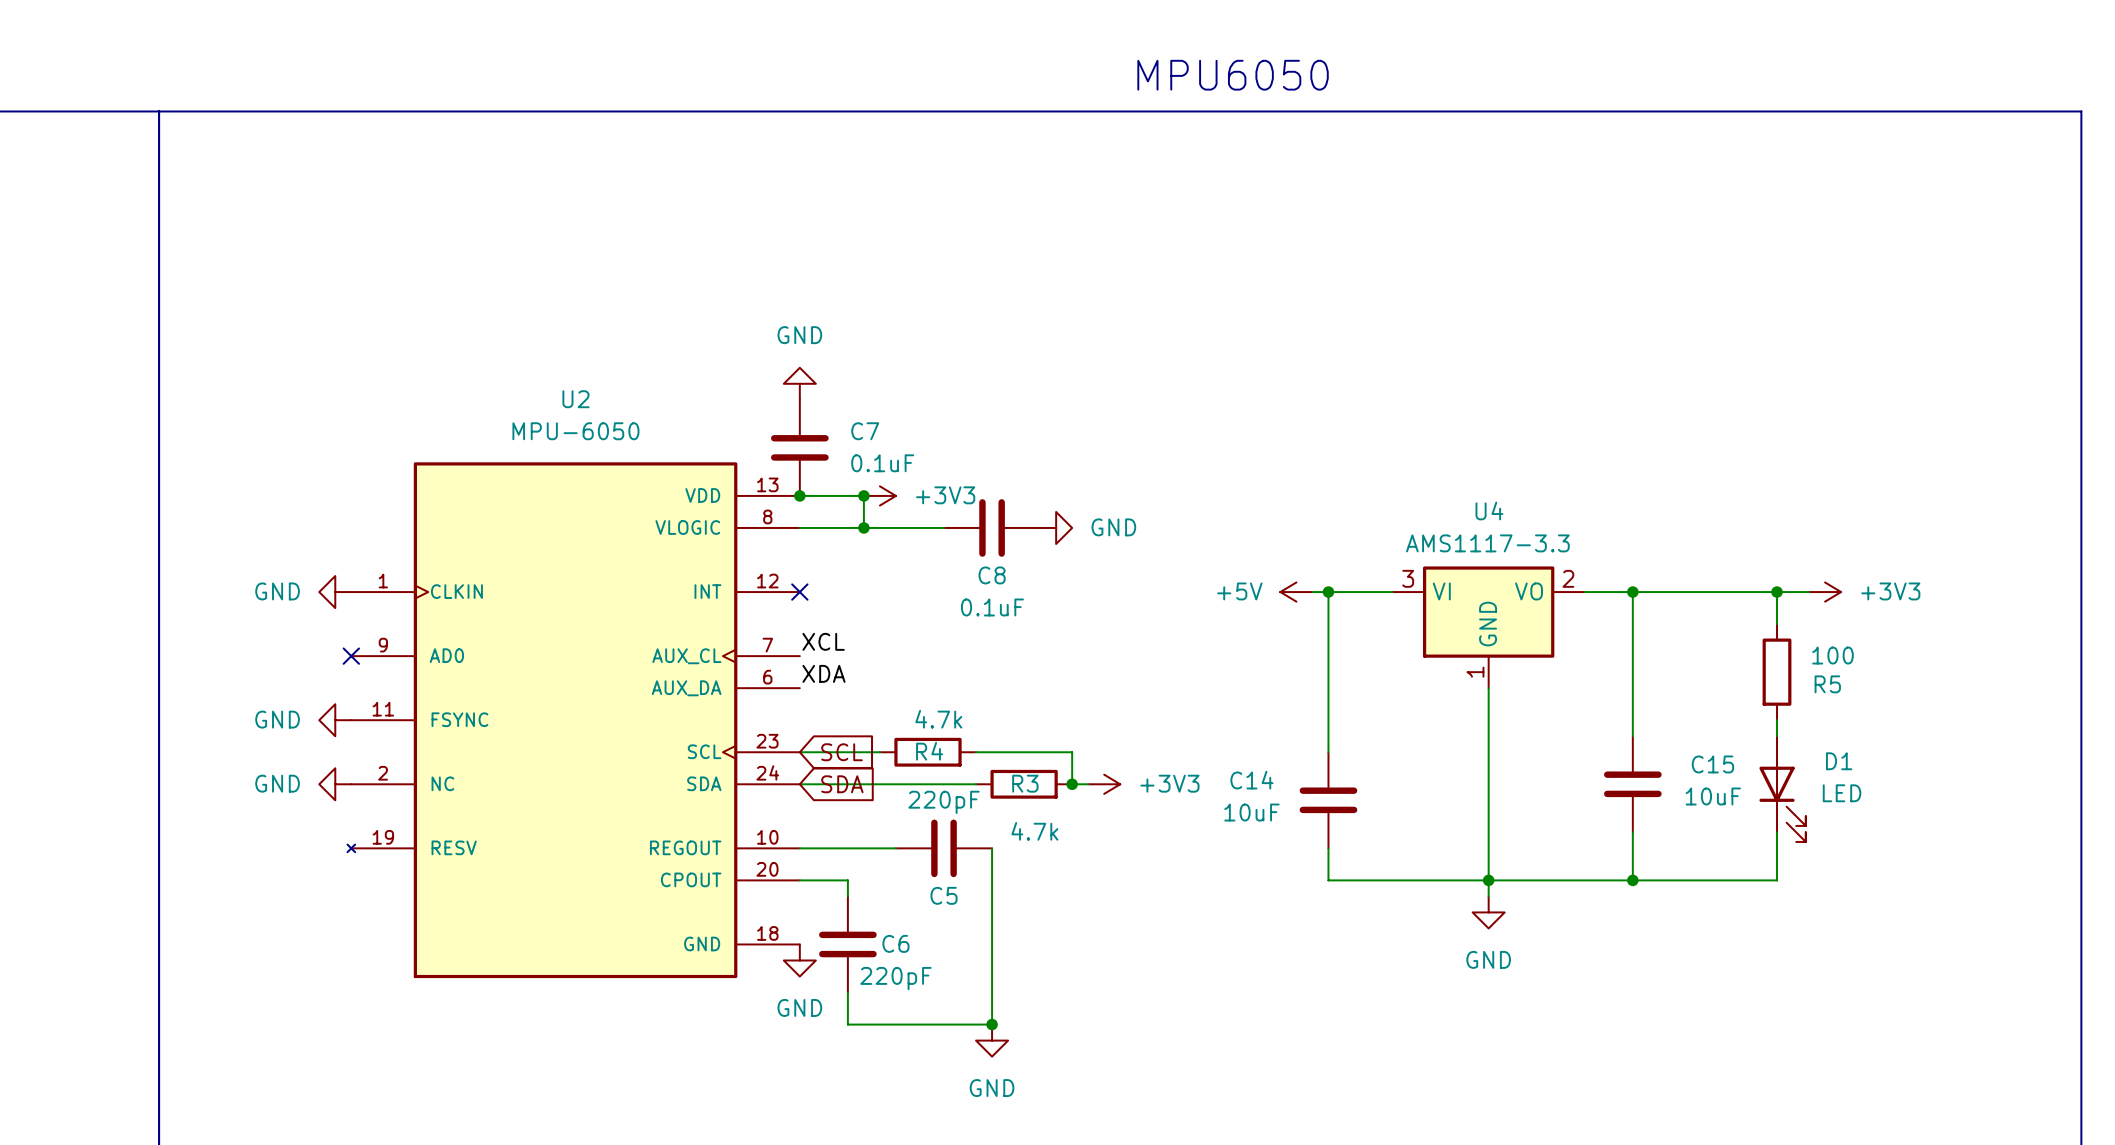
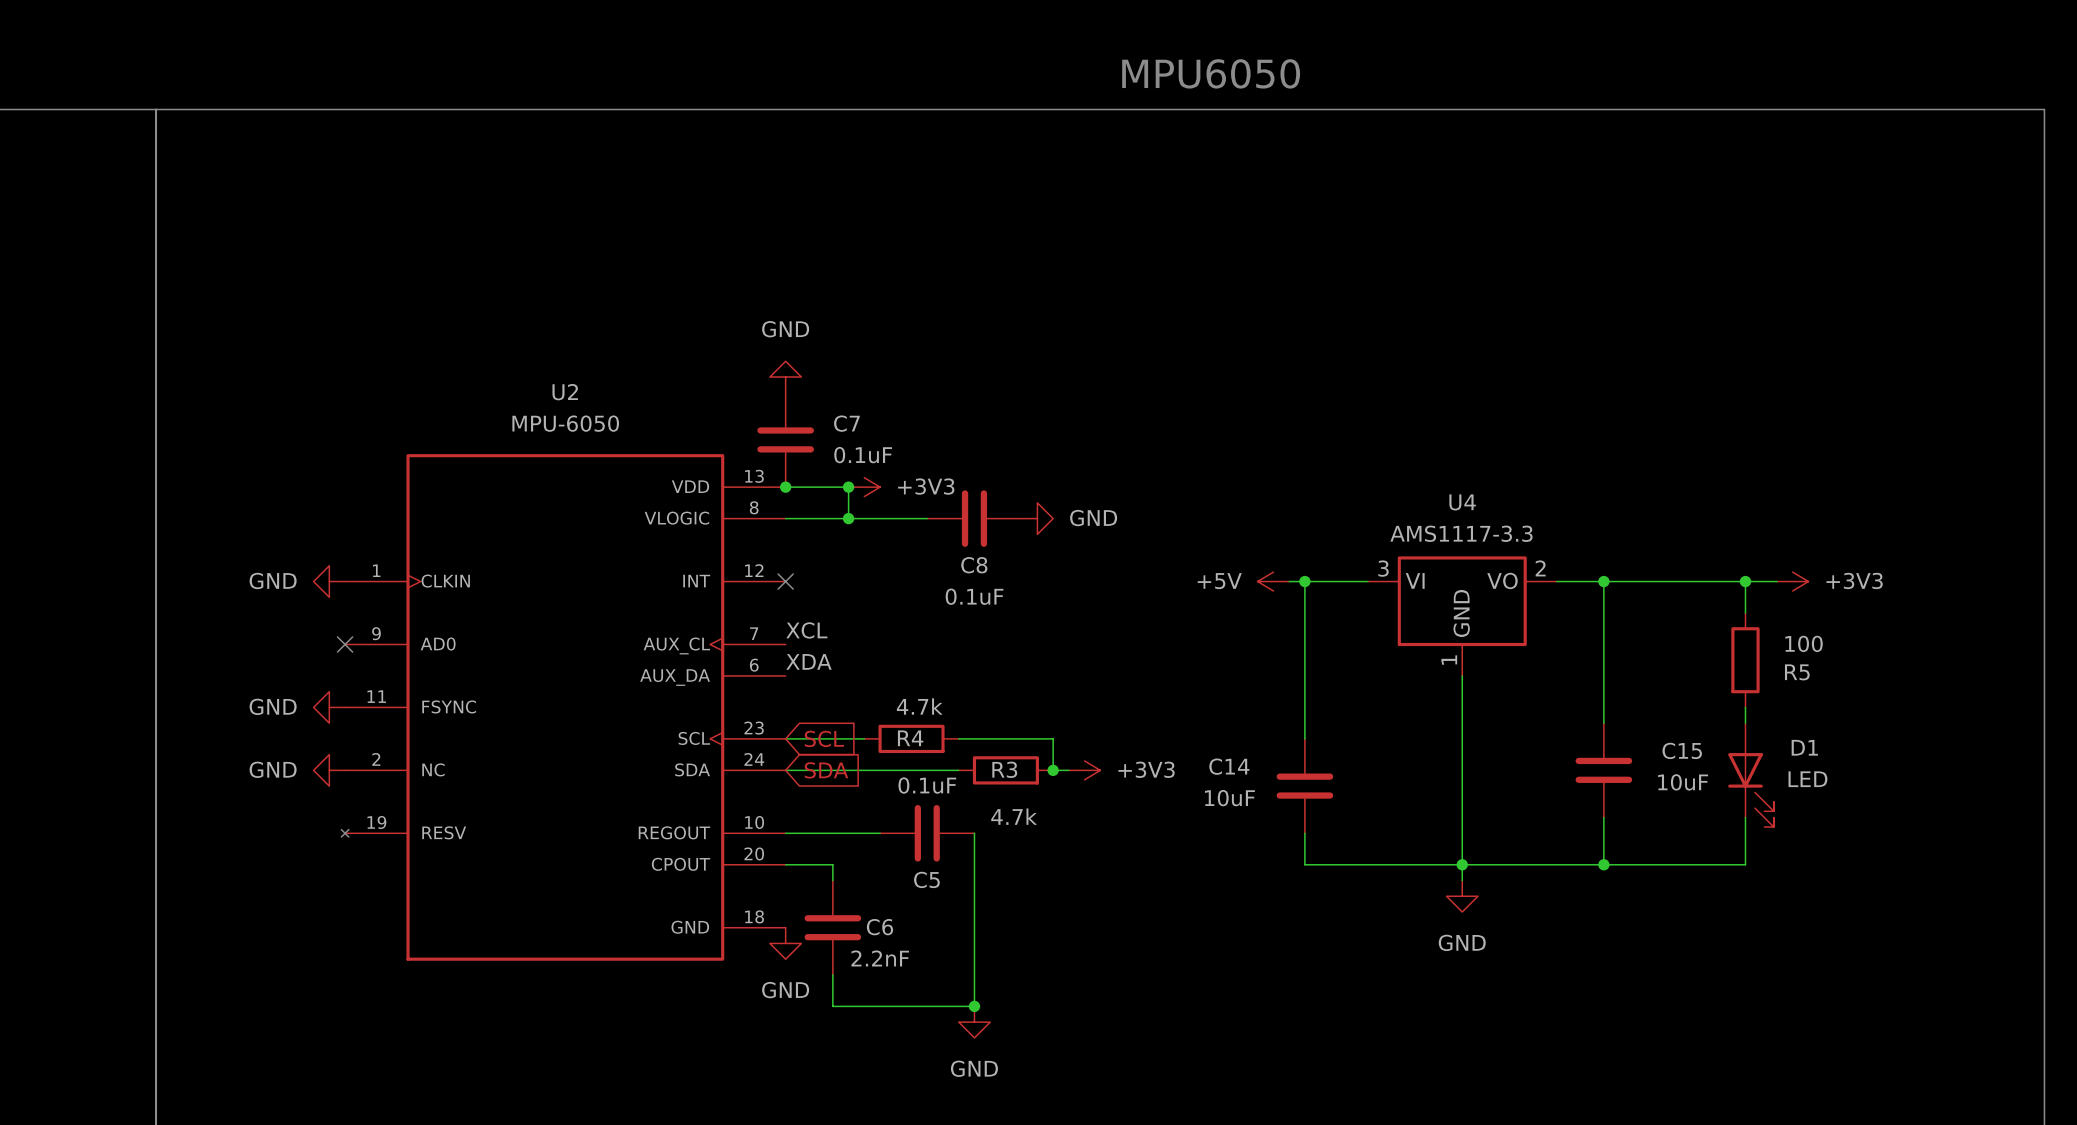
C5 value: 220pF (944, 802) -> 0.1uF (927, 785)
C6 value: 220pF (895, 978) -> 2.2nF (880, 958)

